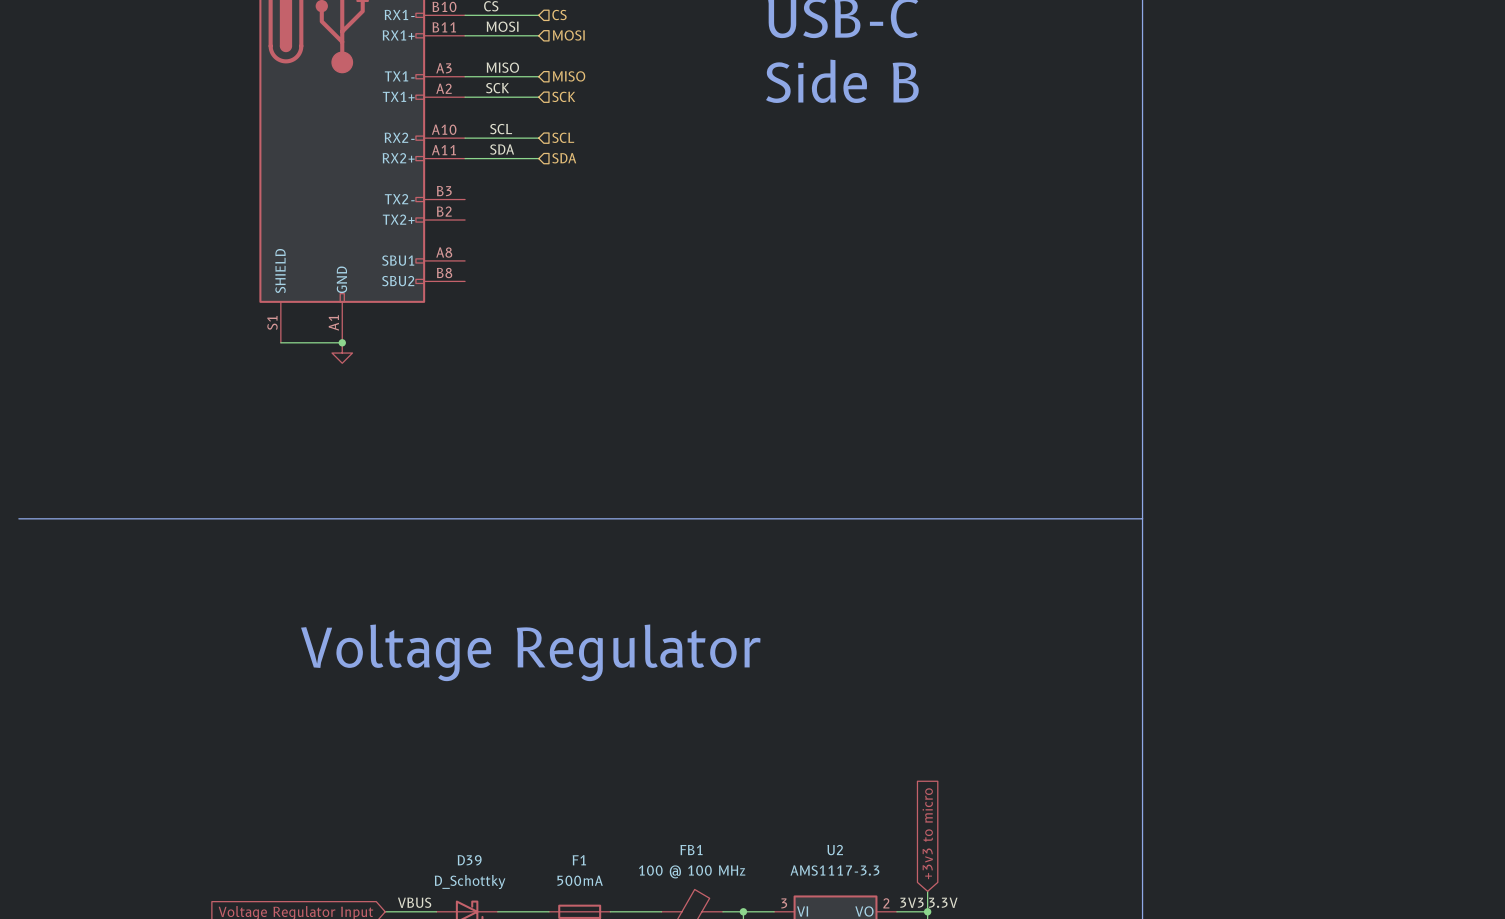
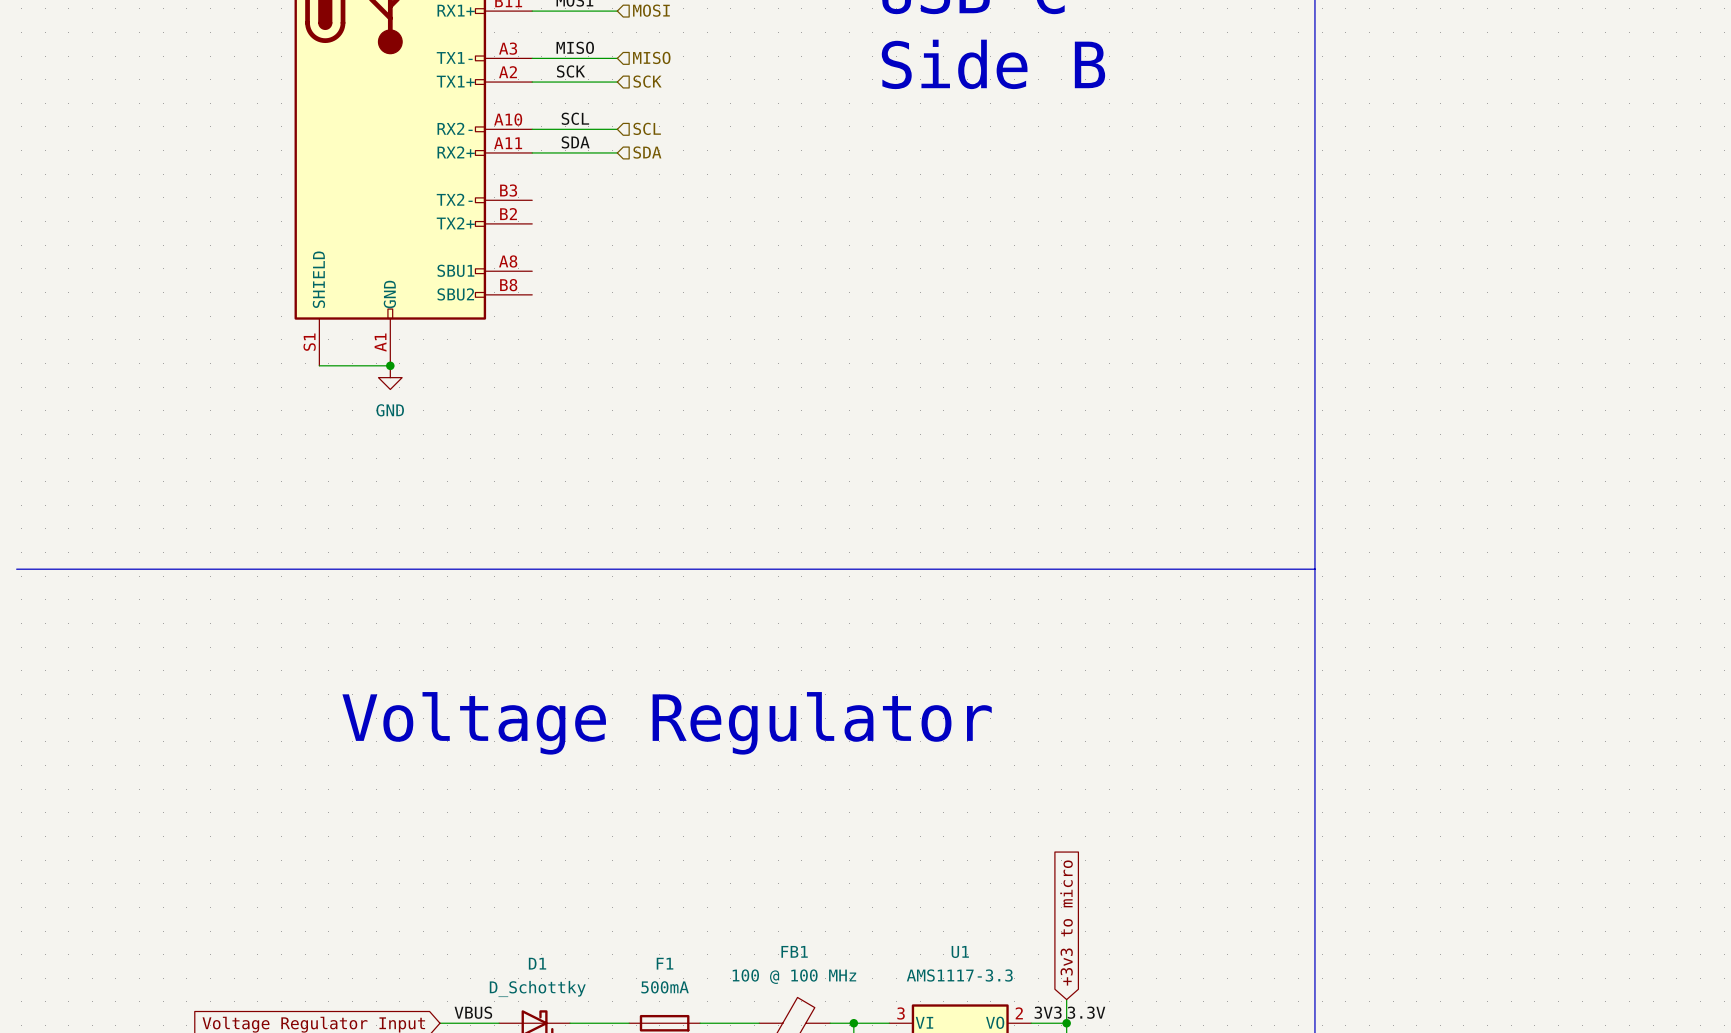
power symbol text: none -> GND (390, 410)
U2 name: U2 (835, 850) -> U1 (960, 951)
D39 name: D39 (469, 860) -> D1 (537, 963)

